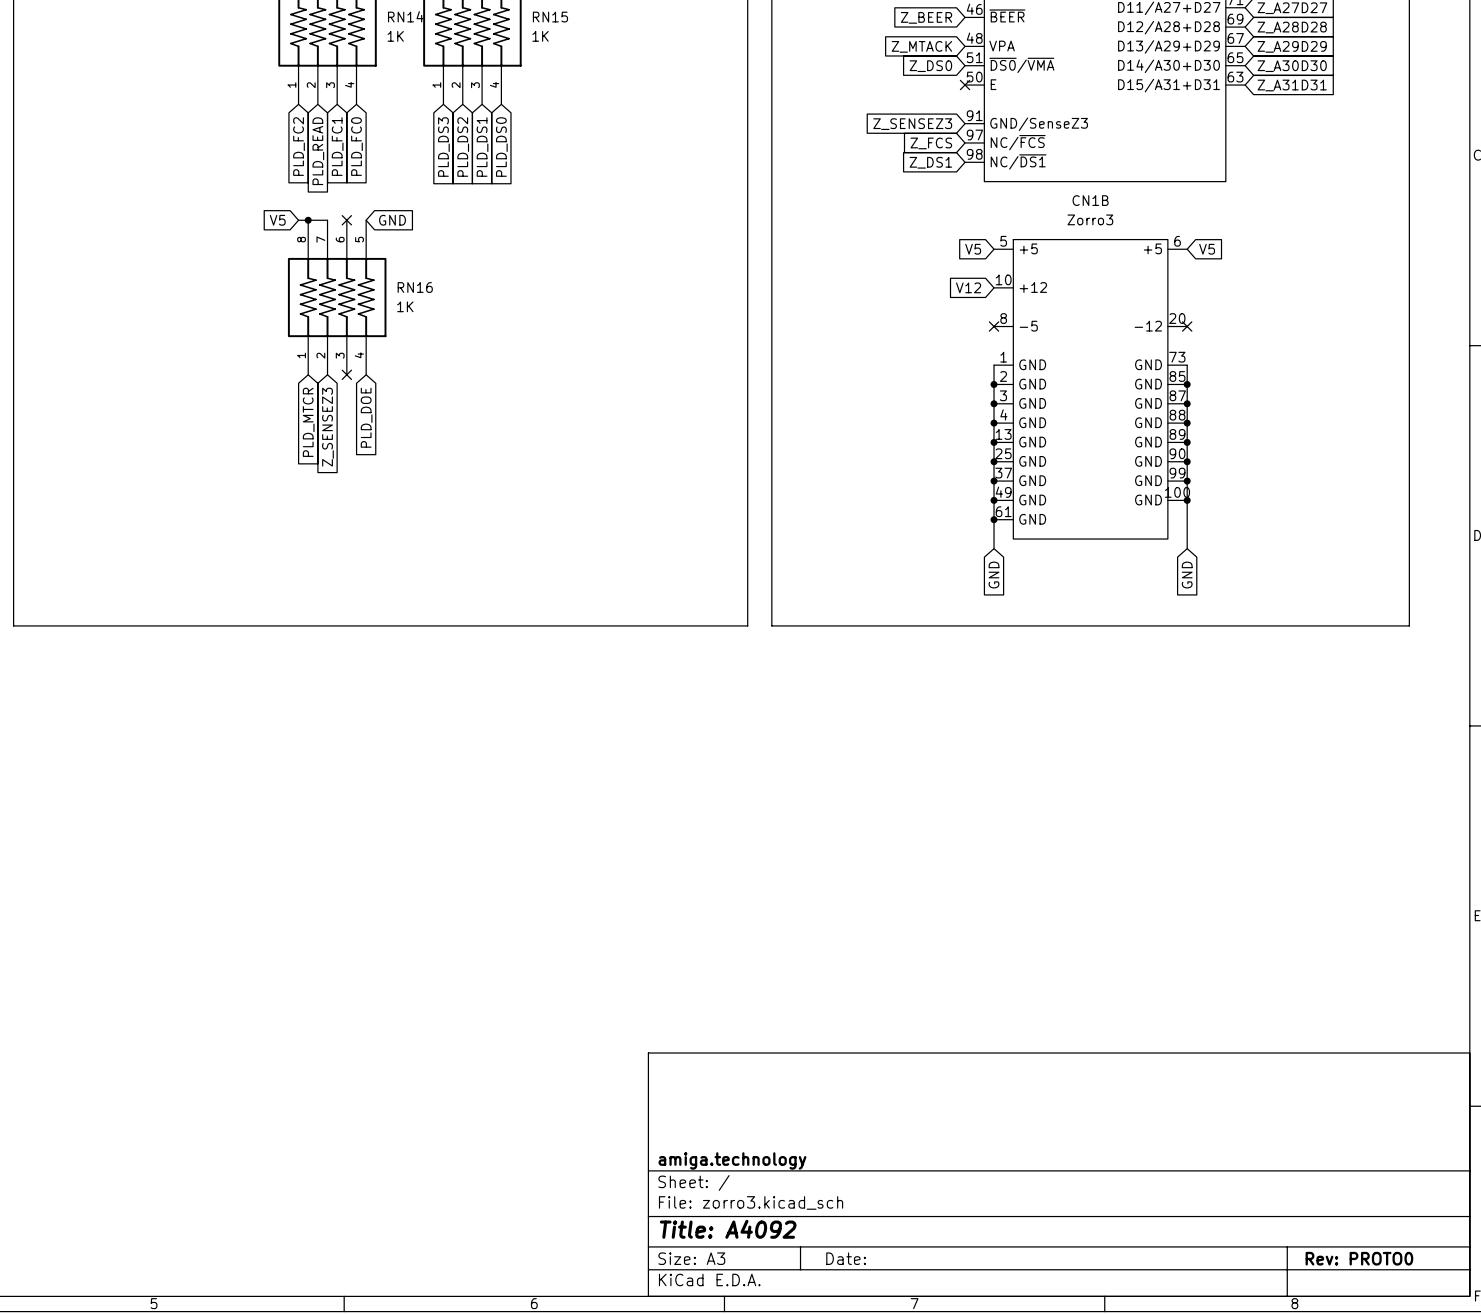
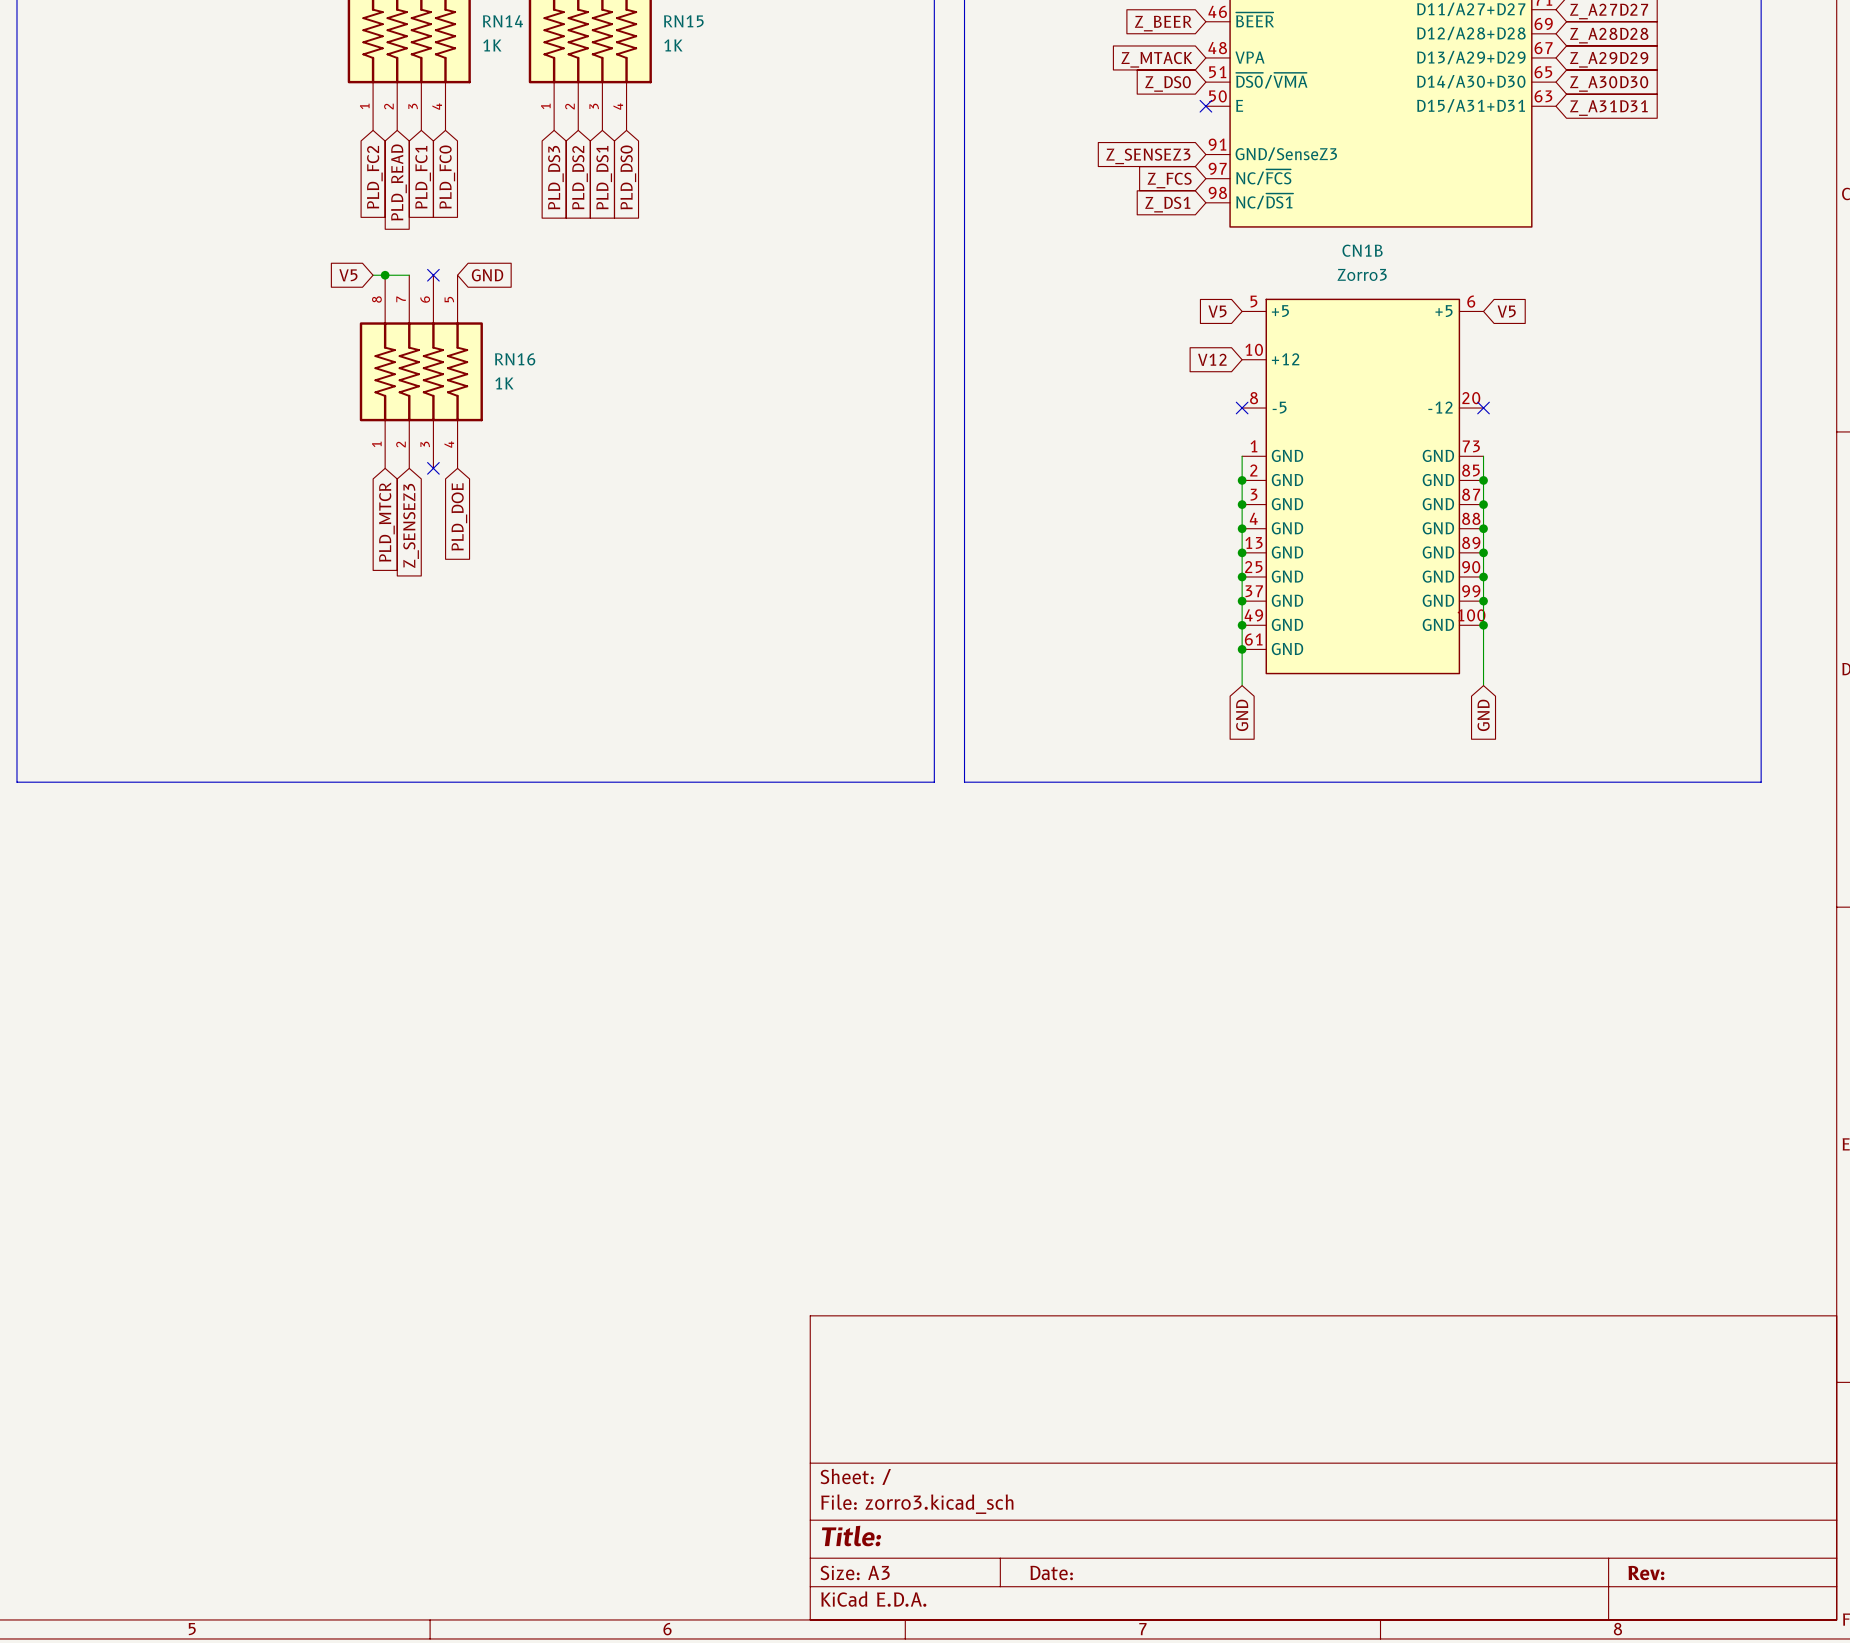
title block: amiga.technology (732, 1160) -> none
title block: Title: A4092 (728, 1229) -> Title: (851, 1536)
title block: Rev: PROTO0 (1359, 1258) -> Rev: (1646, 1573)

